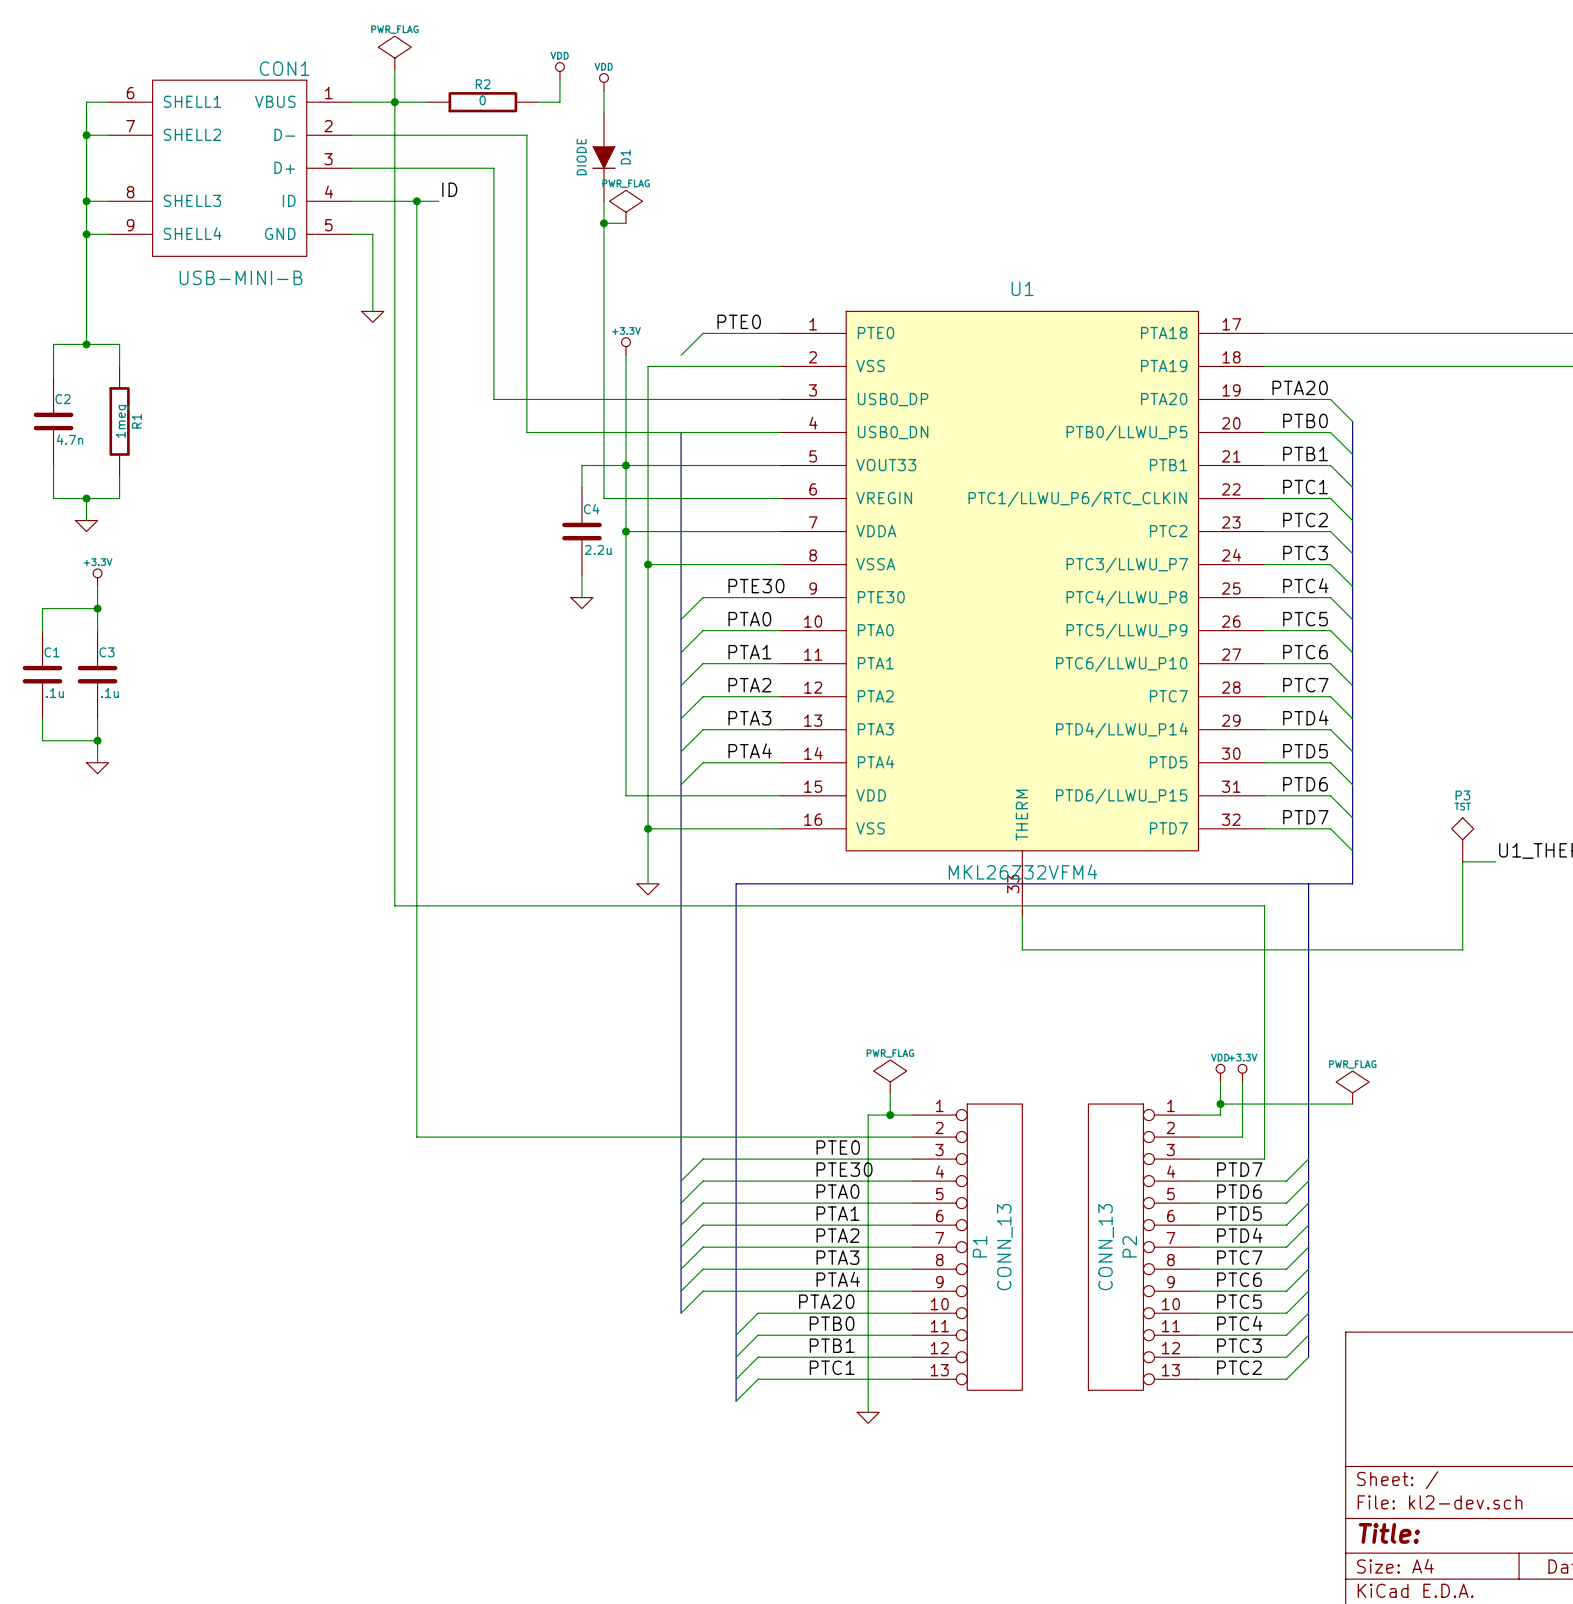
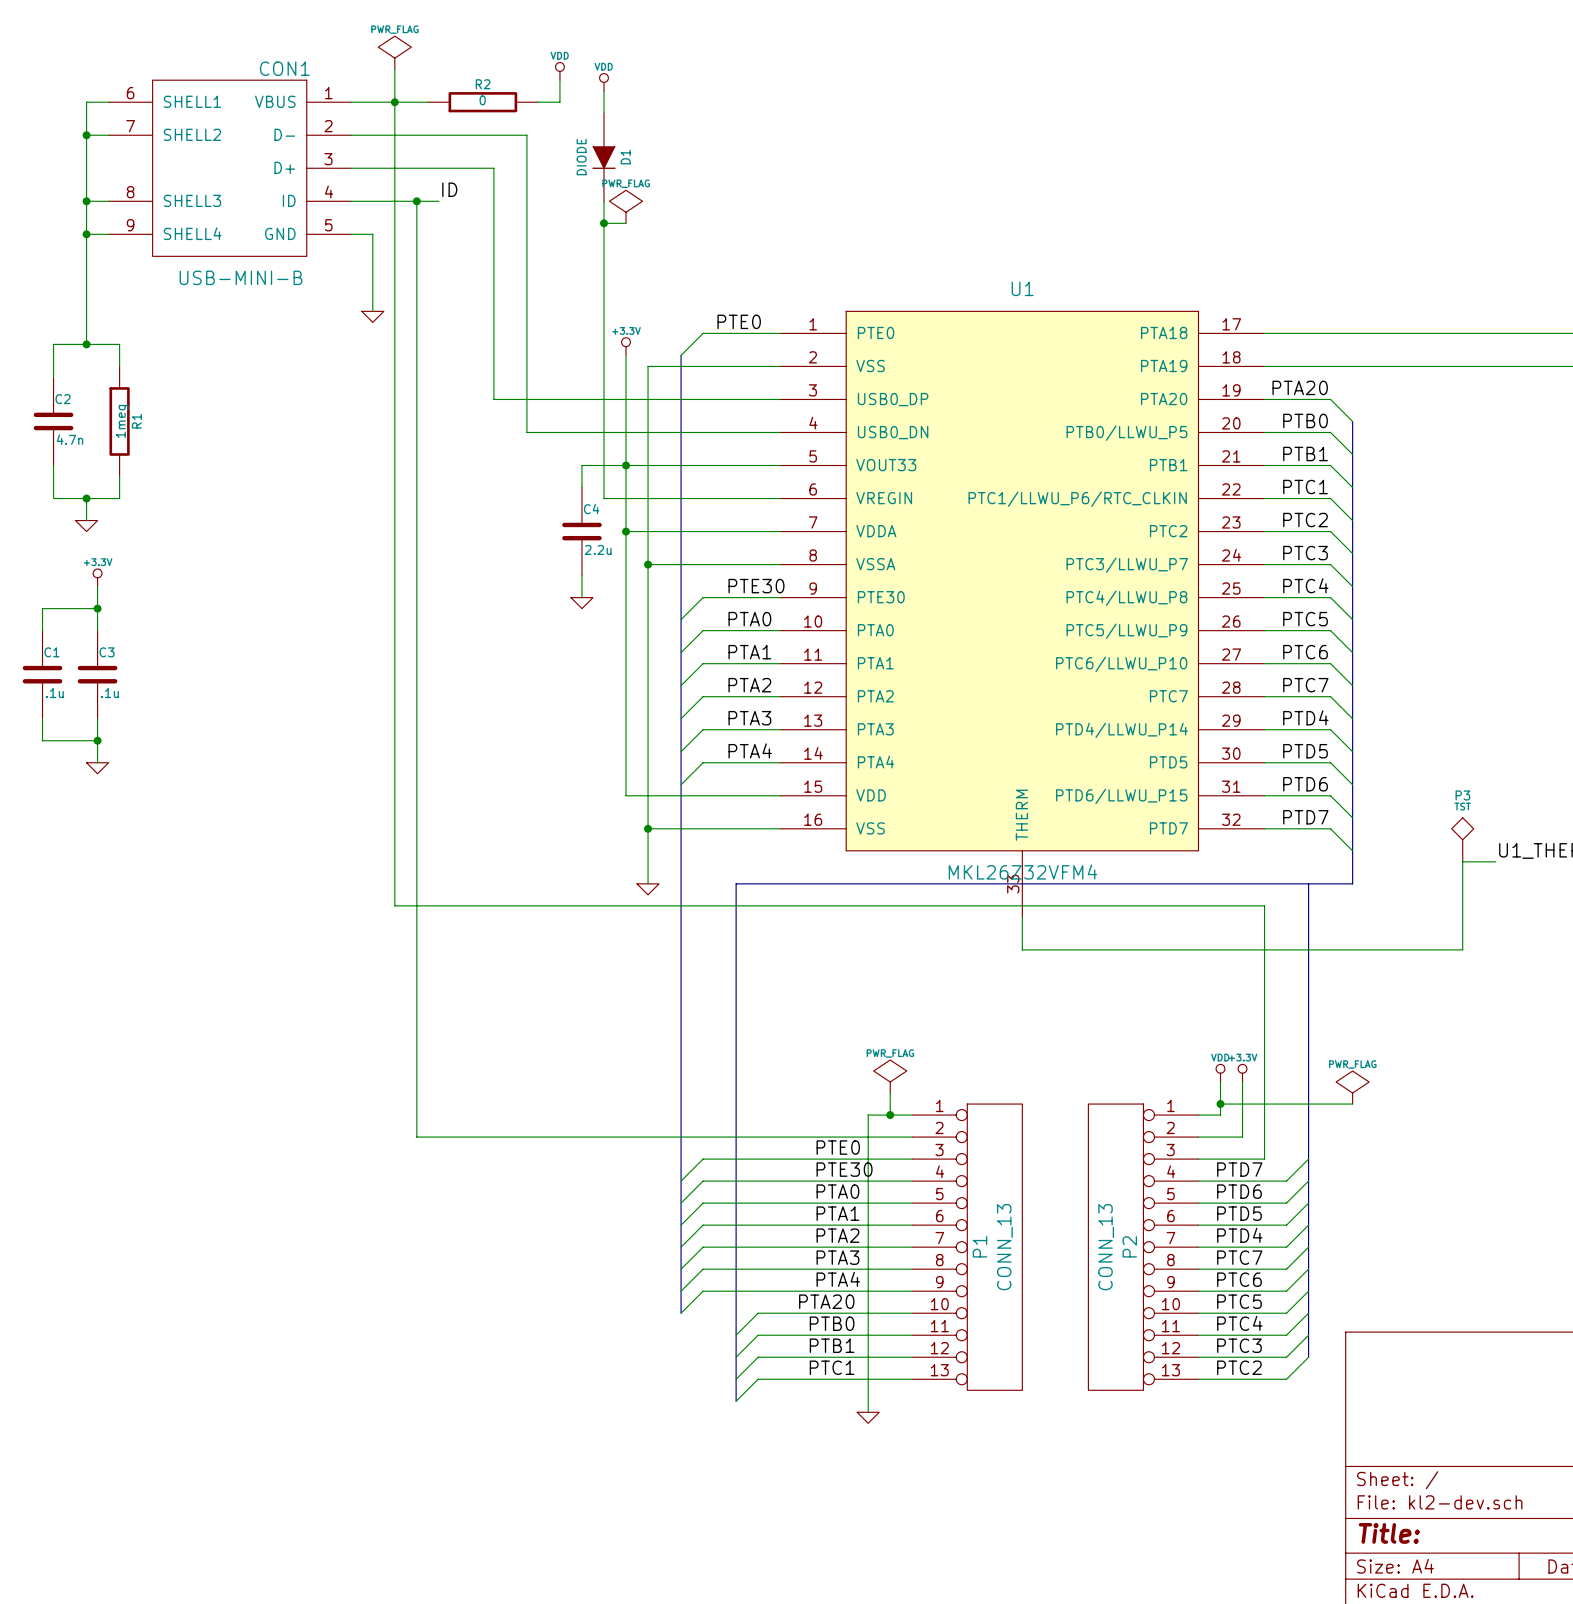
bus: none -> (681, 355) (681, 432)

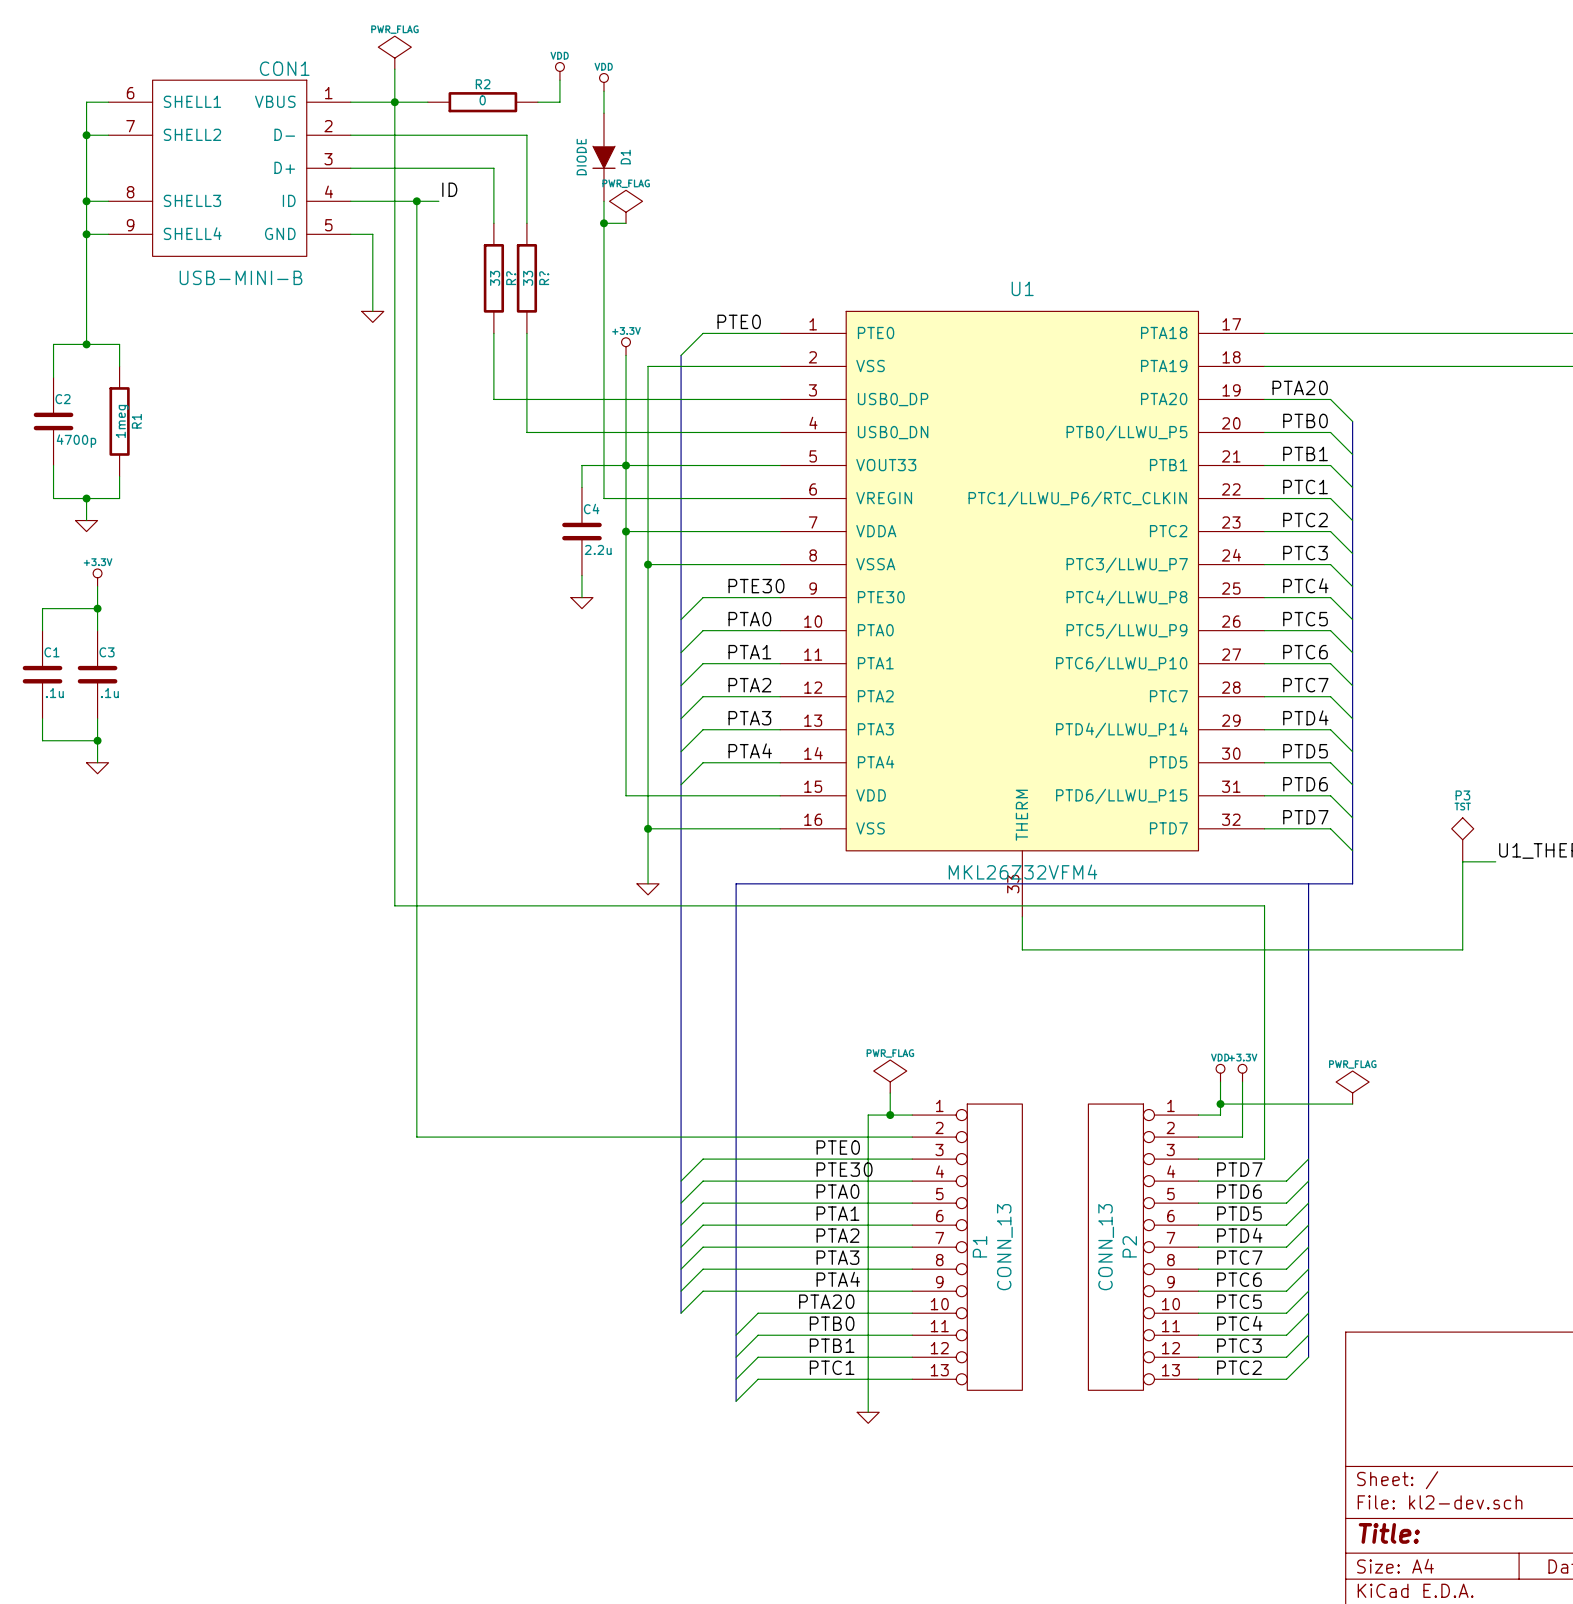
wire: (493, 223) (493, 333) -> none
wire: (526, 223) (526, 333) -> none
R?: none -> 33 (493, 278)
R?: none -> 33 (526, 278)
C2 value: 4.7n (69, 439) -> 4700p (76, 441)

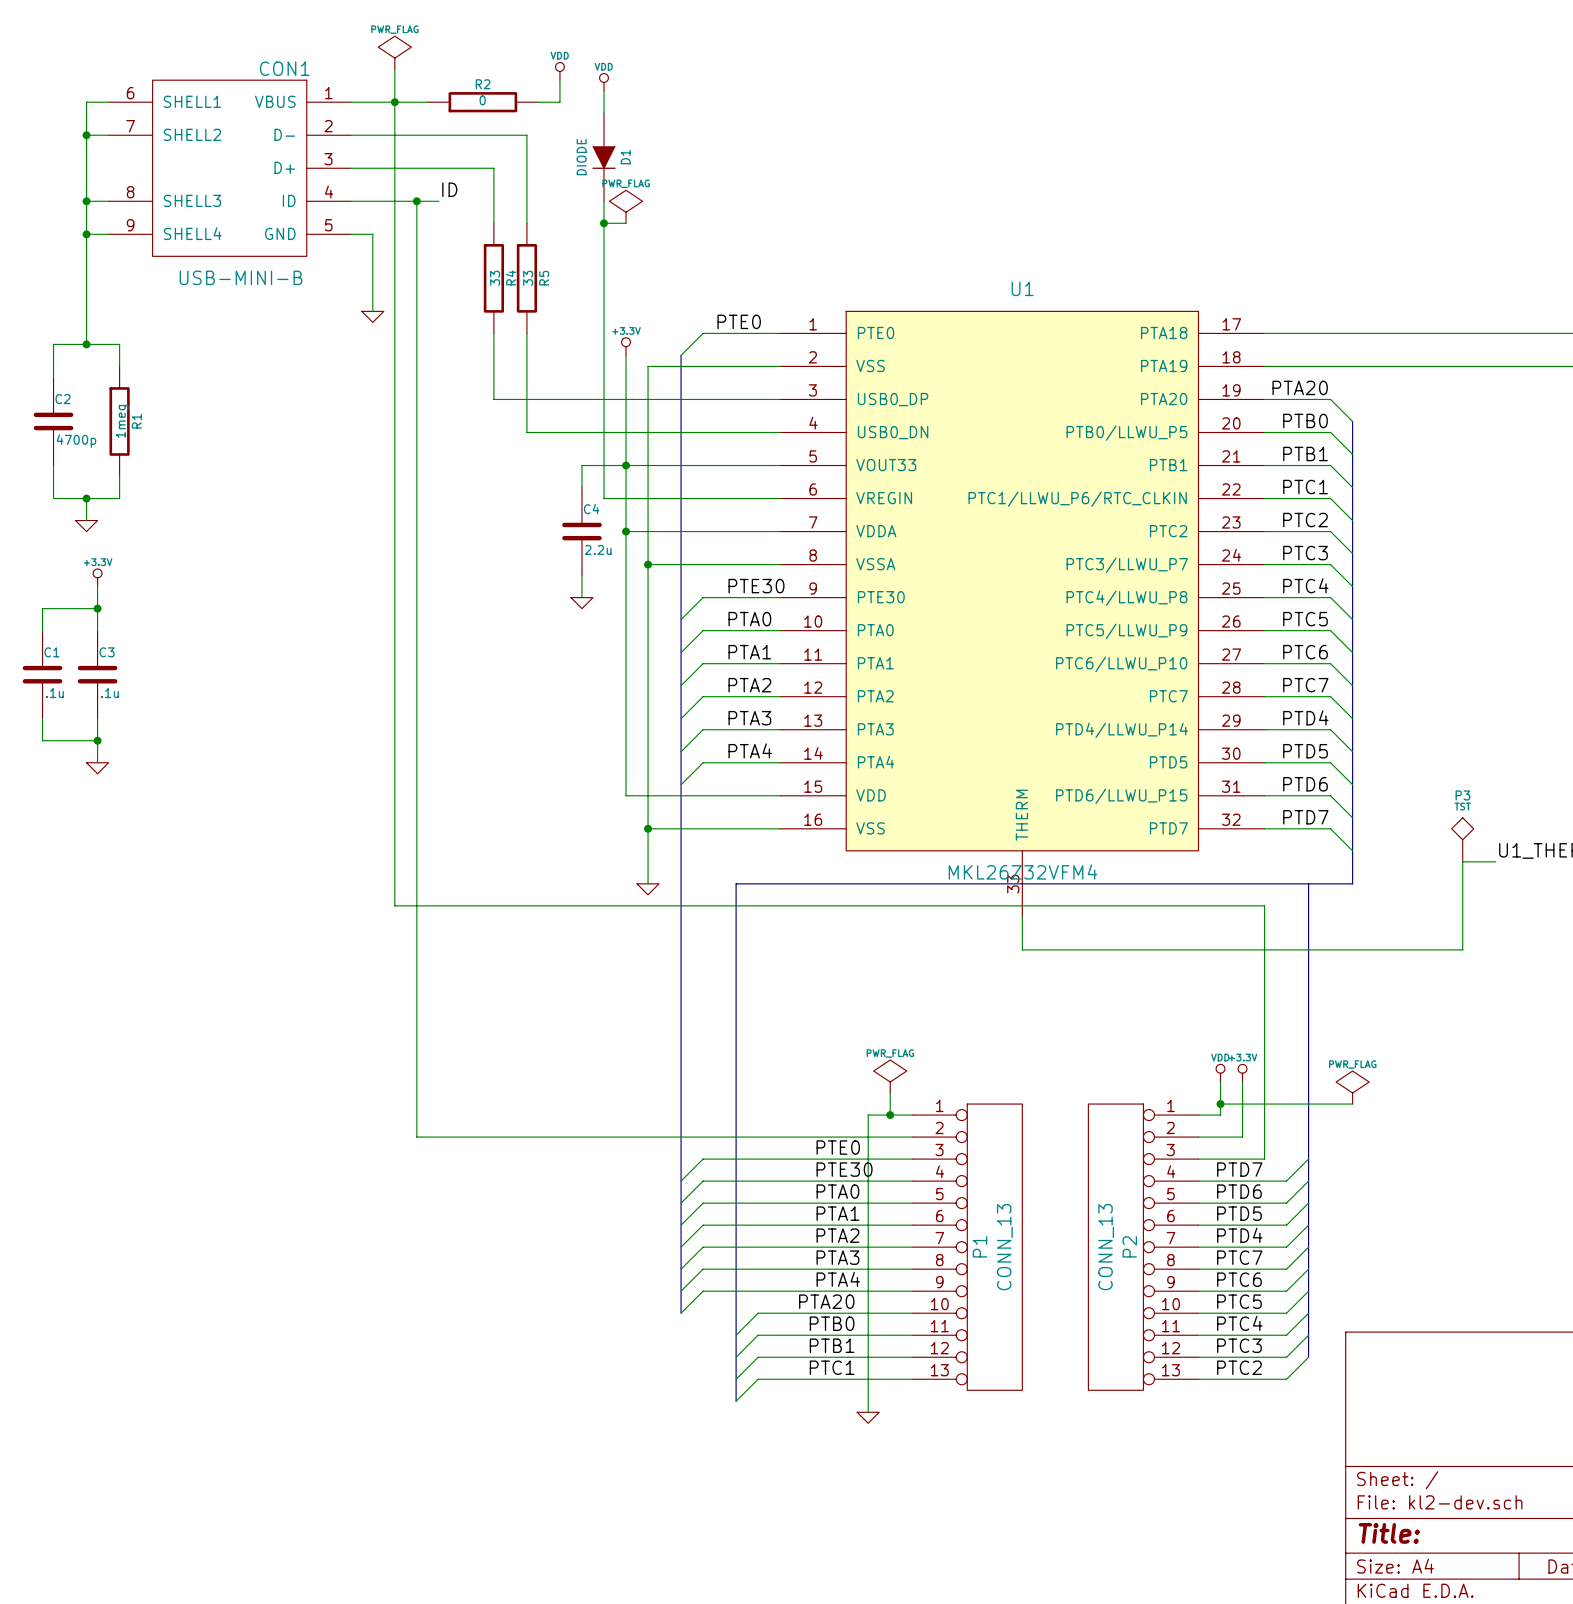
R? name: R? (511, 278) -> R4 (510, 277)
R? name: R? (544, 278) -> R5 (544, 278)

